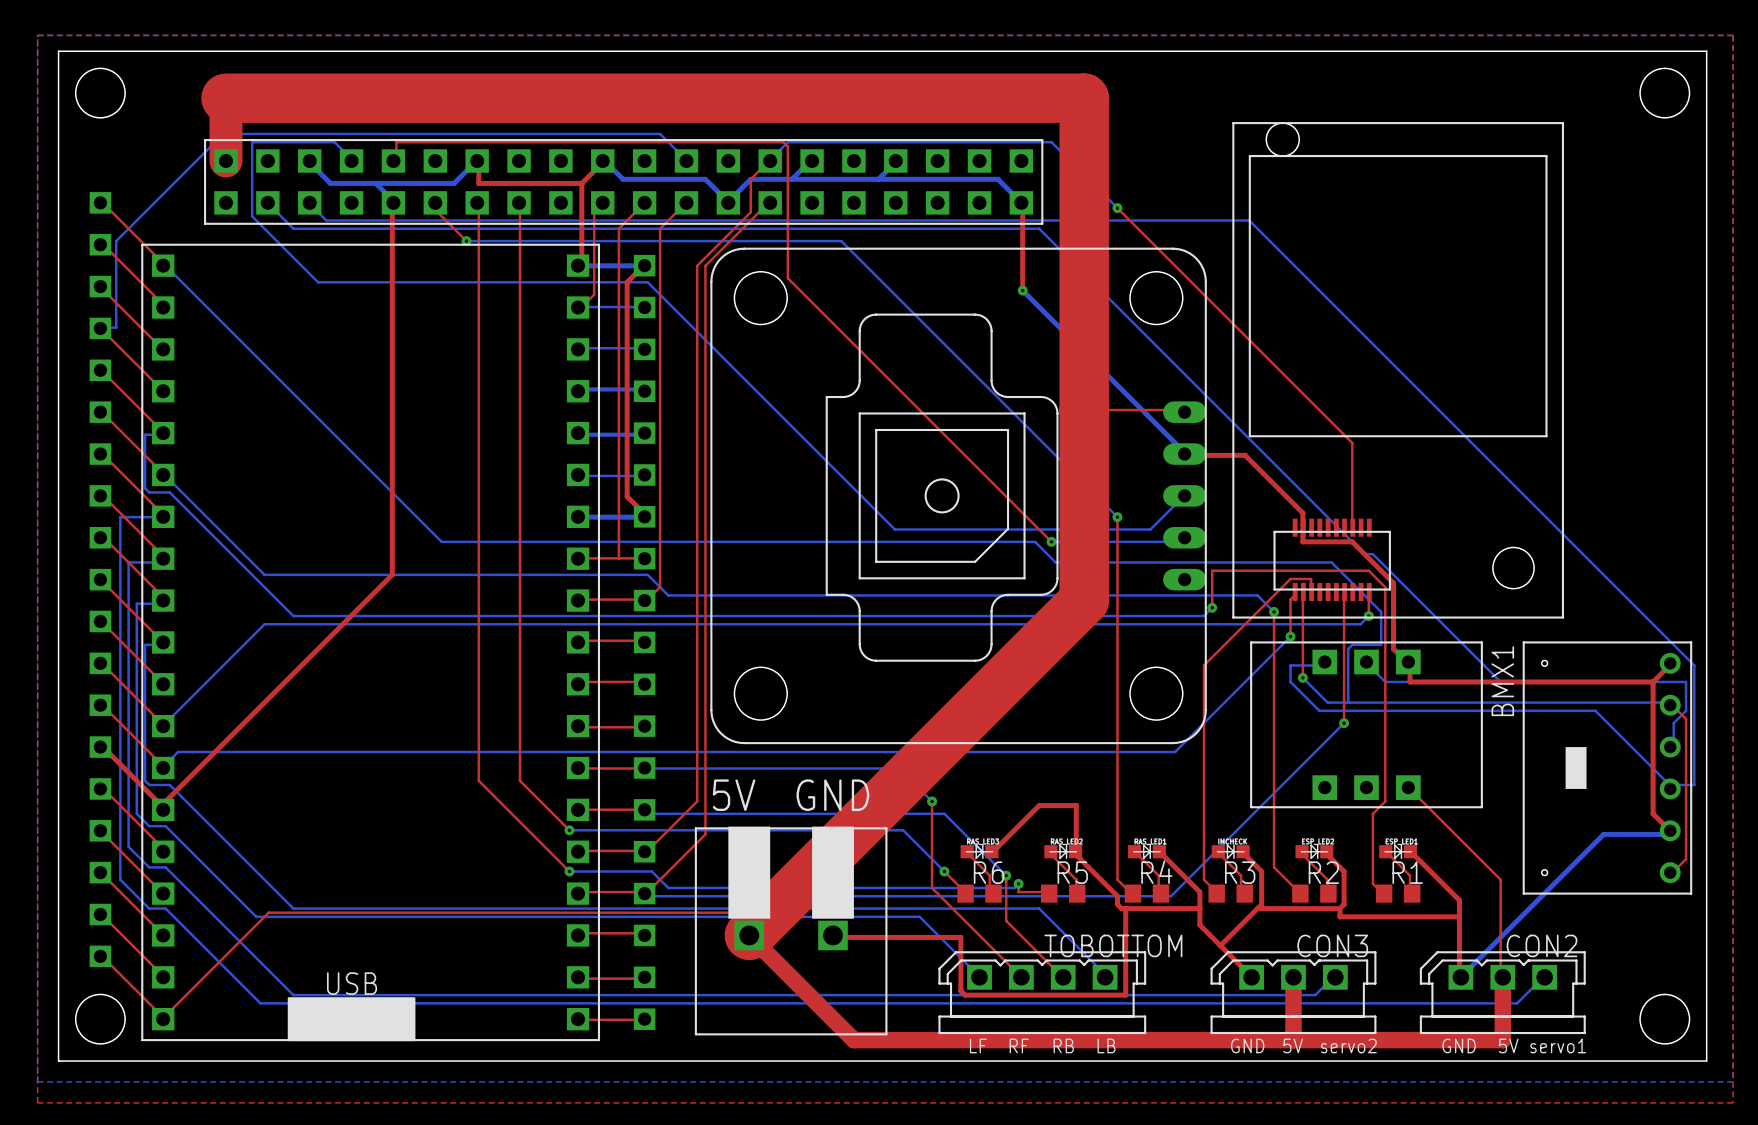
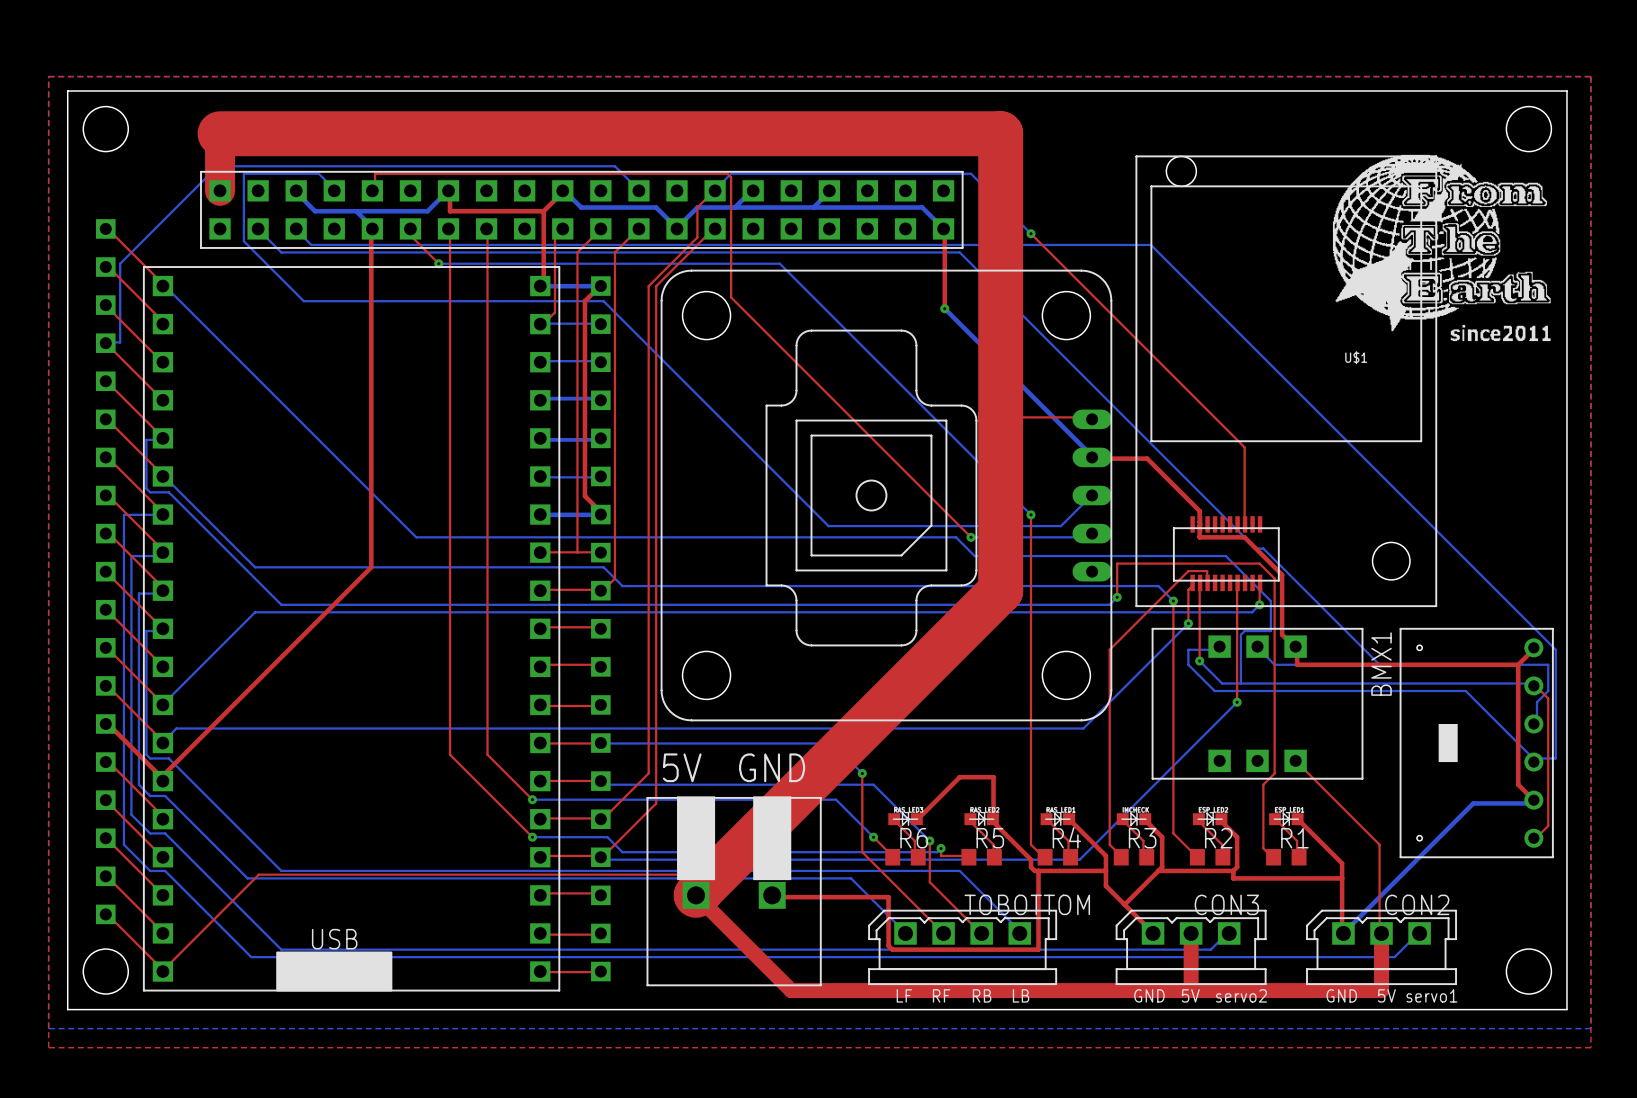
U$1: none -> (1441, 247)

